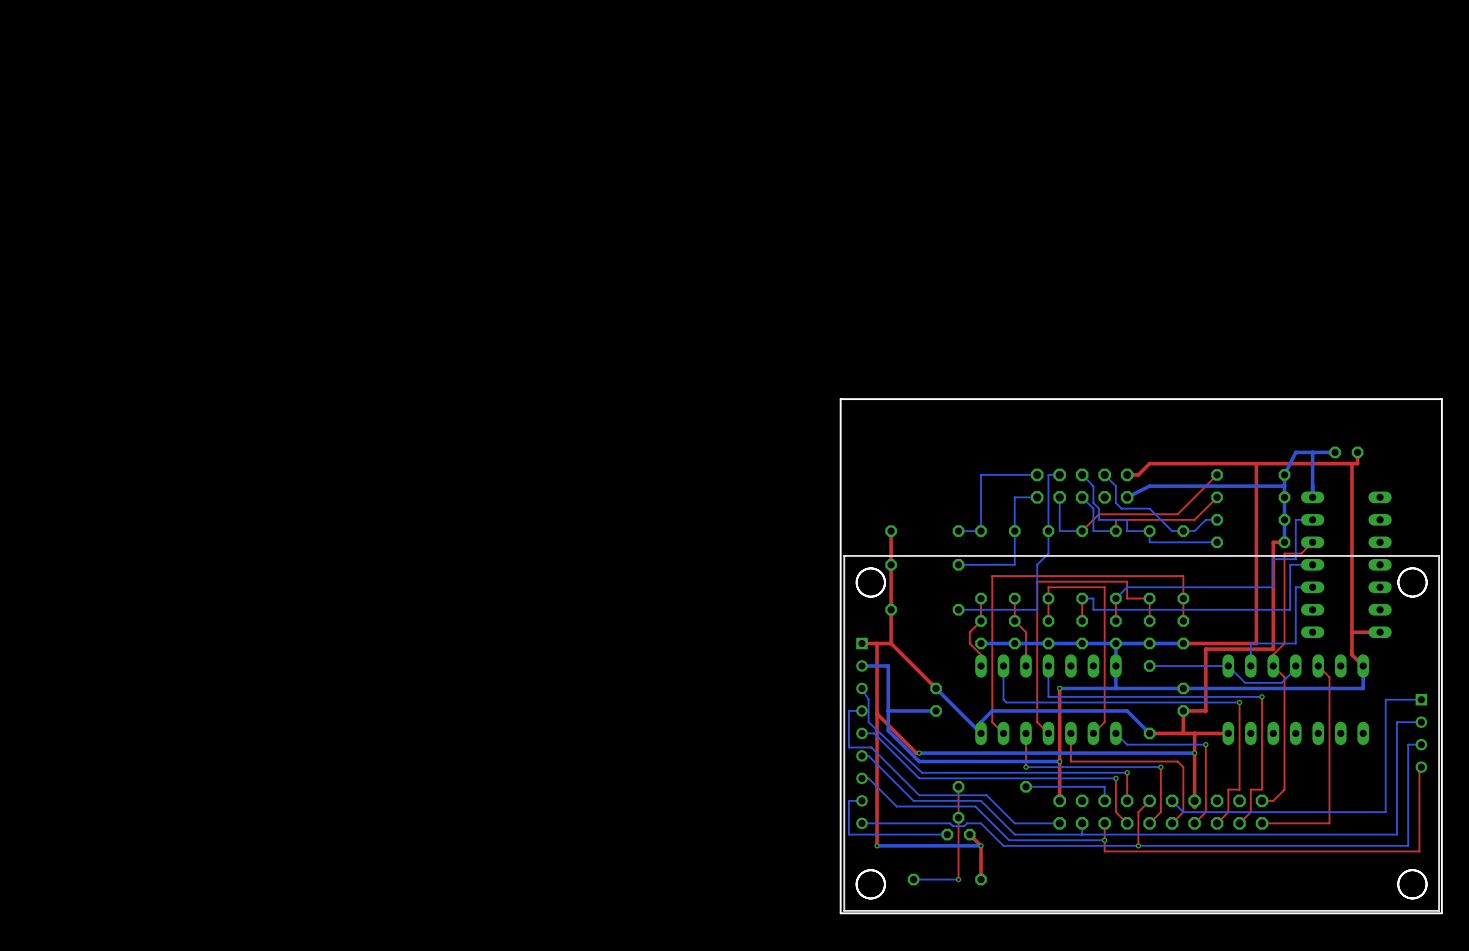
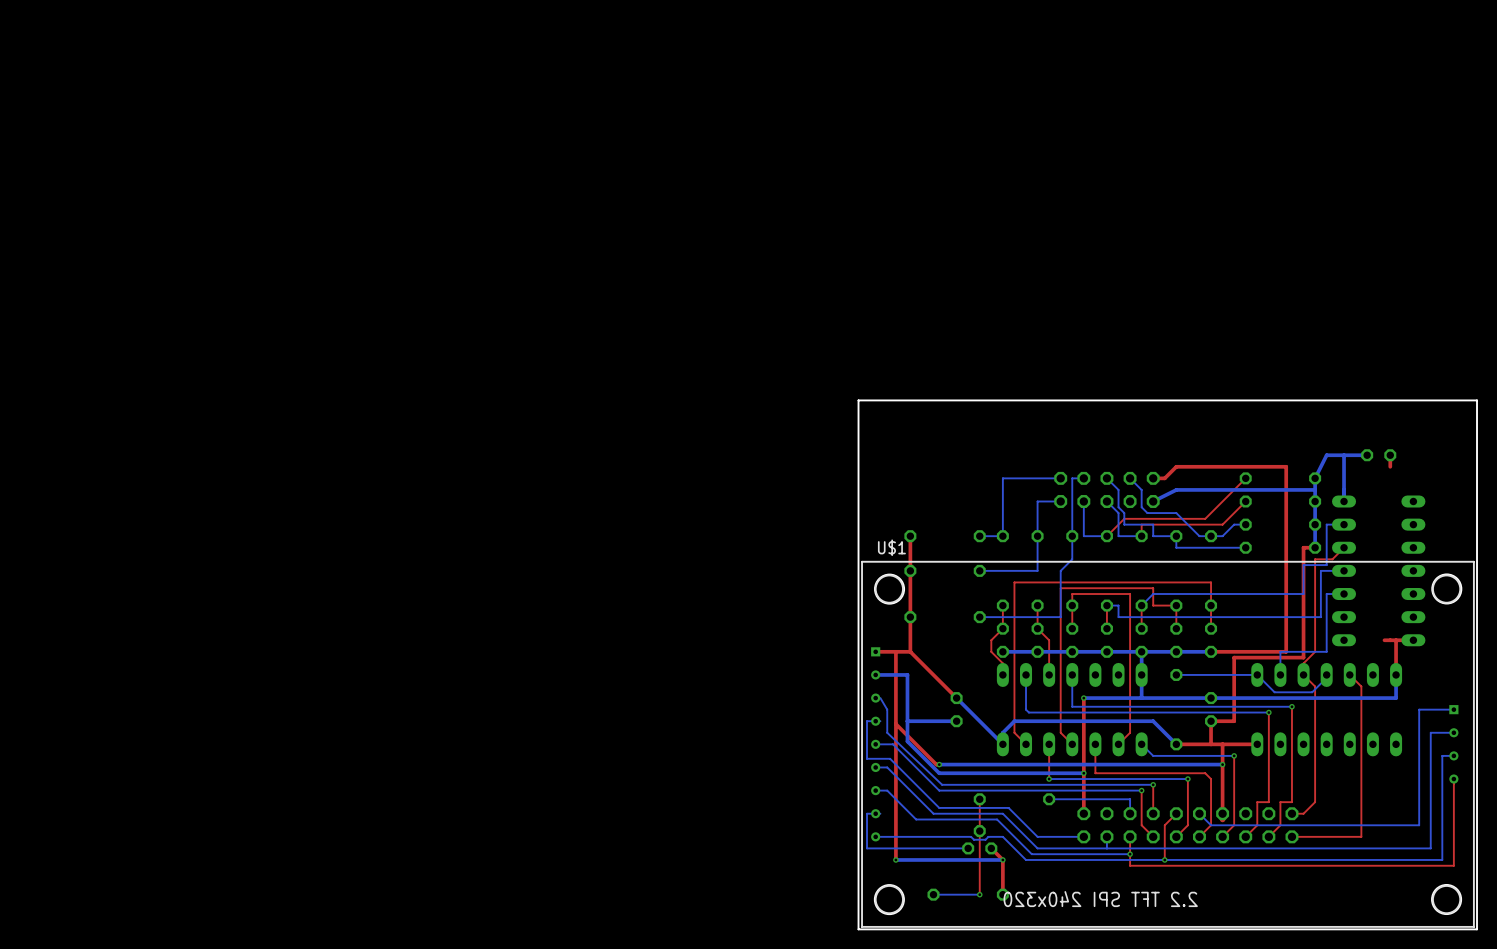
top track: (1351, 463) (1351, 654) (1363, 665) -> (1396, 640) (1396, 674)
top track: (1357, 463) (1256, 463) -> none
part: (1141, 733) -> none
U$1: none -> (1167, 744)

